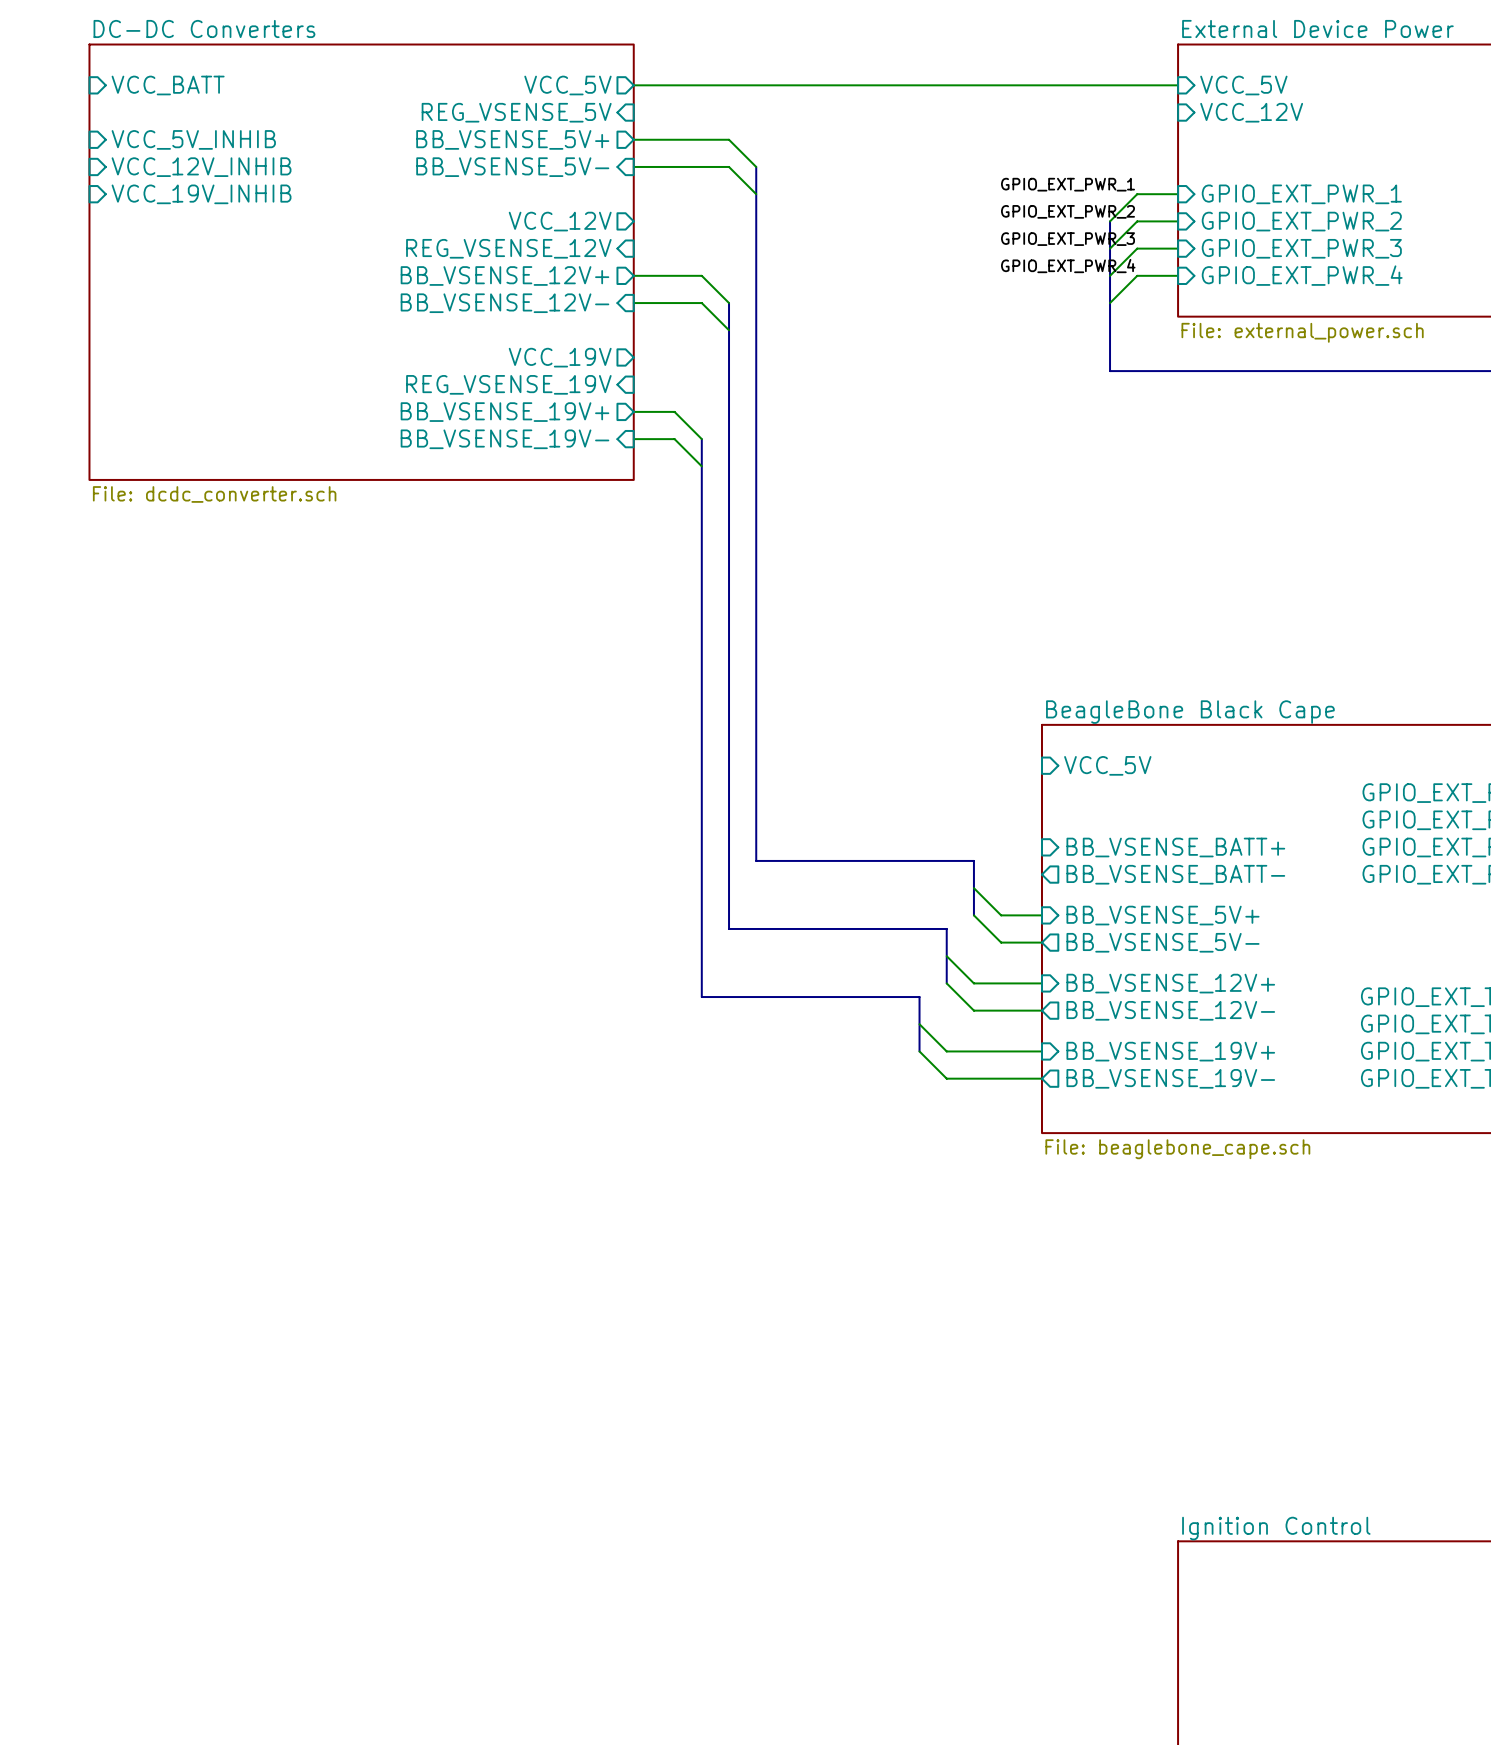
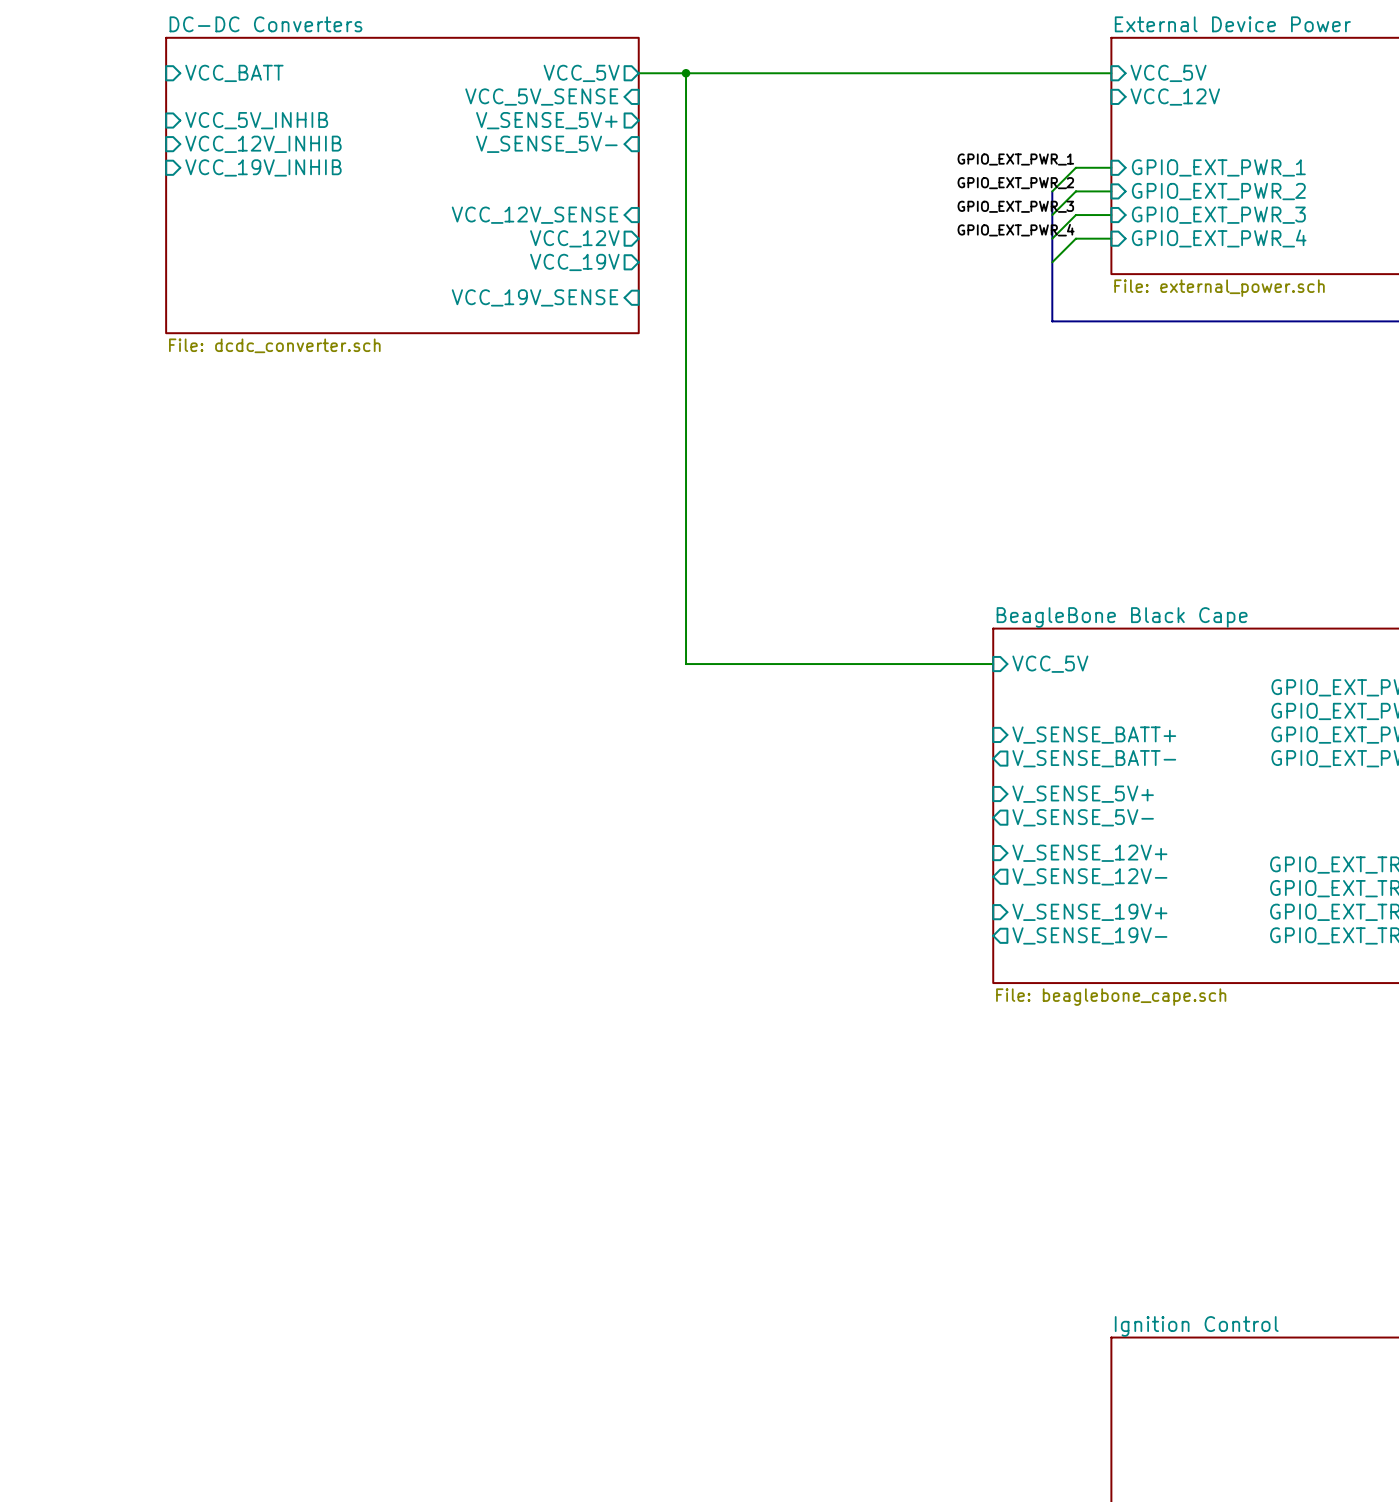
wire: none -> (686, 73) (686, 664) (993, 664)
junction: none -> (686, 73)
sheet pin: REG_VSENSE_5V (516, 112) -> VCC_5V_SENSE (541, 97)
sheet pin: BB_VSENSE_5V+ (512, 139) -> V_SENSE_5V+ (546, 120)
wire: (633, 139) (729, 139) (756, 166) -> none
wire: (633, 166) (729, 166) (756, 194) -> none
bus: (756, 166) (756, 860) (973, 860) (973, 915) -> none
sheet pin: BB_VSENSE_5V- (512, 167) -> V_SENSE_5V- (546, 144)
sheet DC-DC Converters: none -> File: dcdc_converter.sch (402, 185)
sheet pin: VCC_12V (560, 221) -> none
sheet pin: REG_VSENSE_12V (508, 248) -> VCC_12V_SENSE (535, 215)
sheet DC-DC Converters: File: dcdc_converter.sch (361, 262) -> none
wire: (633, 275) (701, 275) (729, 303) -> none
sheet pin: BB_VSENSE_12V+ (504, 276) -> VCC_12V (574, 238)
sheet pin shape: input (504, 303) -> output (574, 262)
sheet pin: BB_VSENSE_12V- (504, 303) -> VCC_19V (574, 262)
wire: (633, 303) (701, 303) (729, 330) -> none
bus: (729, 303) (729, 928) (946, 928) (946, 983) -> none
sheet pin shape: output (560, 357) -> input (535, 297)
sheet pin: VCC_19V (560, 357) -> VCC_19V_SENSE (535, 297)
sheet pin: REG_VSENSE_19V (508, 384) -> none
wire: (633, 411) (674, 411) (701, 439) -> none
sheet pin: BB_VSENSE_19V+ (504, 412) -> none
sheet pin: BB_VSENSE_19V- (504, 439) -> none
wire: (633, 439) (674, 439) (701, 466) -> none
bus: (701, 439) (701, 997) (919, 997) (919, 1051) -> none
sheet pin: BB_VSENSE_BATT+ (1175, 847) -> V_SENSE_BATT+ (1094, 735)
sheet pin: BB_VSENSE_BATT- (1175, 874) -> V_SENSE_BATT- (1094, 758)
wire: (973, 888) (1001, 915) (1041, 915) -> none
wire: (973, 915) (1001, 942) (1041, 942) -> none
sheet pin: BB_VSENSE_5V+ (1163, 915) -> V_SENSE_5V+ (1083, 794)
sheet pin: BB_VSENSE_5V- (1163, 942) -> V_SENSE_5V- (1083, 817)
wire: (946, 956) (973, 983) (1041, 983) -> none
wire: (946, 983) (973, 1010) (1041, 1010) -> none
sheet pin: BB_VSENSE_12V+ (1170, 983) -> V_SENSE_12V+ (1089, 853)
sheet pin: BB_VSENSE_12V- (1170, 1010) -> V_SENSE_12V- (1089, 876)
wire: (919, 1024) (946, 1051) (1041, 1051) -> none
wire: (919, 1051) (946, 1078) (1041, 1078) -> none
sheet pin: BB_VSENSE_19V+ (1170, 1051) -> V_SENSE_19V+ (1089, 912)
sheet pin: BB_VSENSE_19V- (1170, 1078) -> V_SENSE_19V- (1089, 935)

